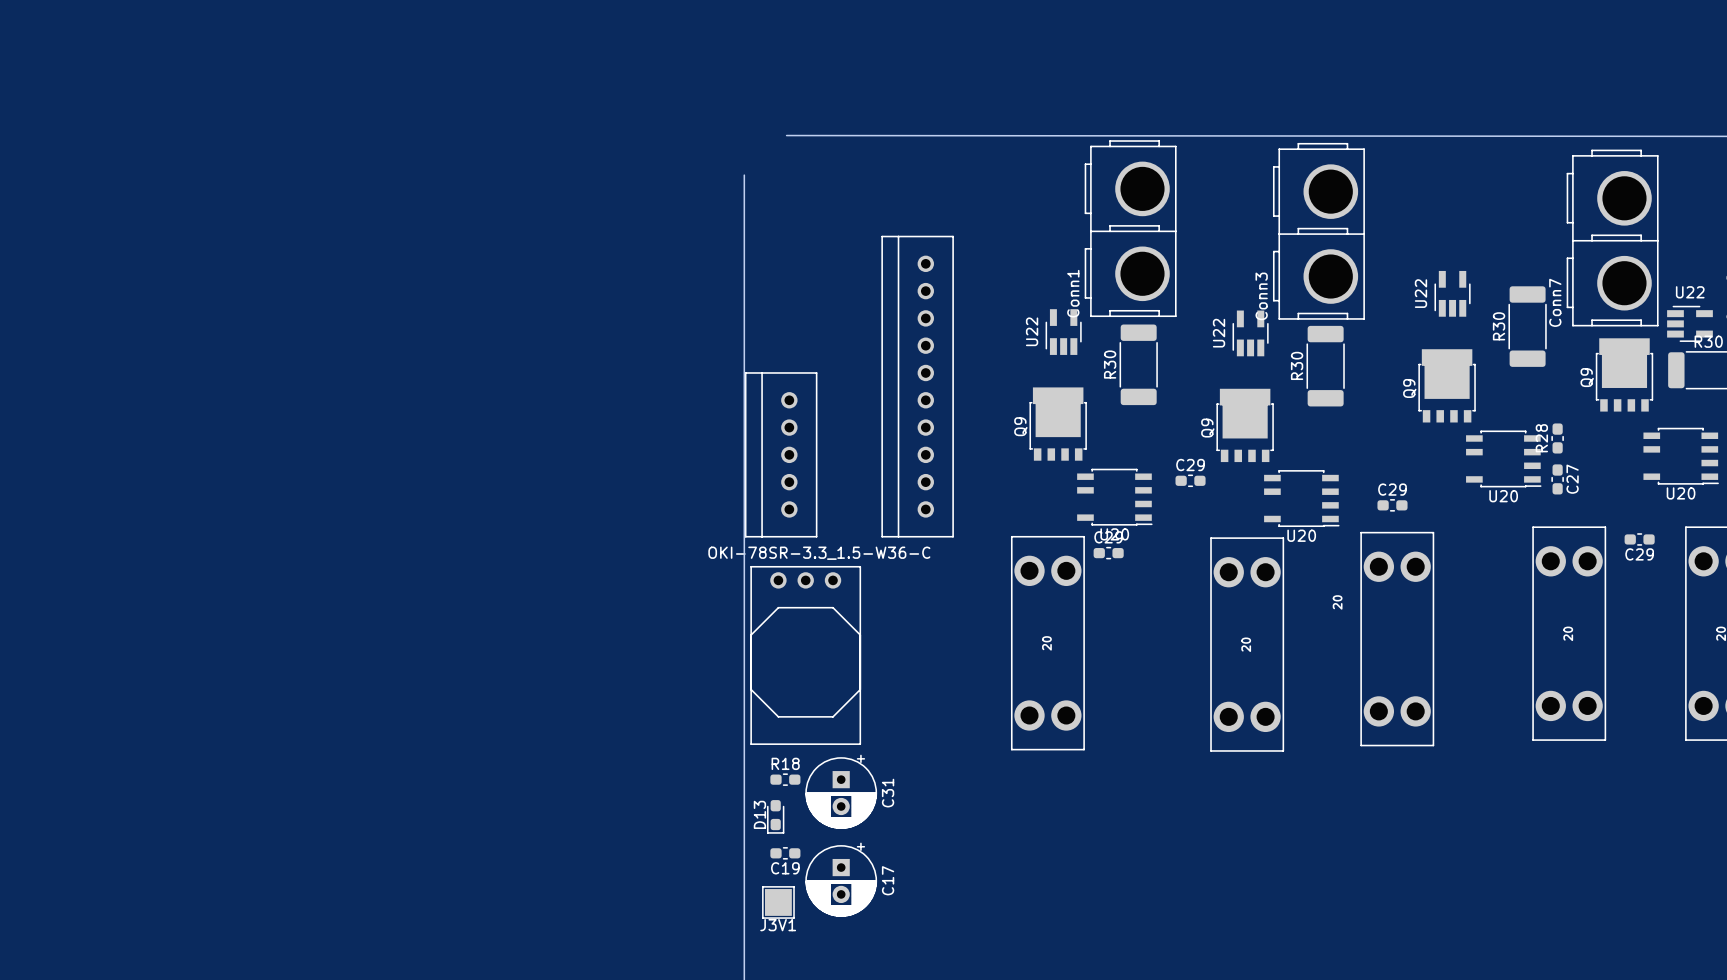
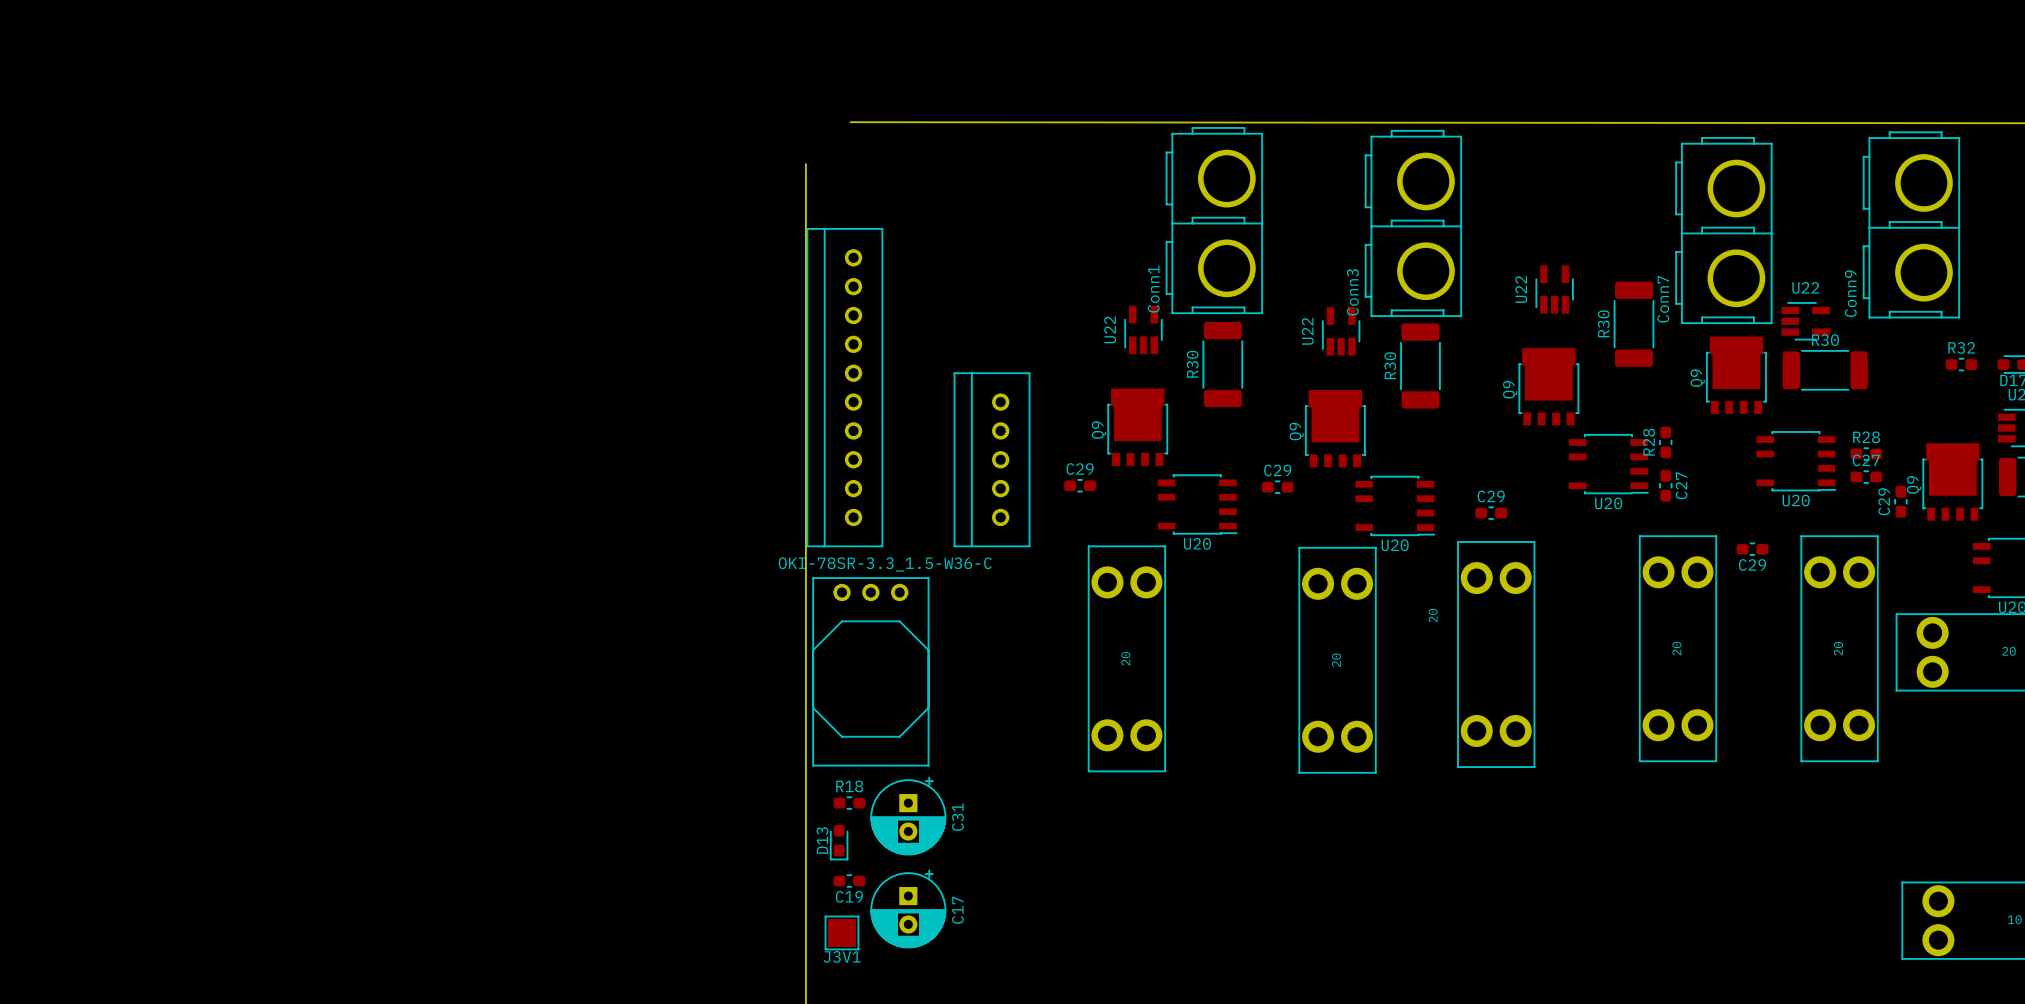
part position: (917, 386) -> (844, 387)
part position: (781, 454) -> (992, 459)
C29 position: (1108, 553) -> (1080, 485)

